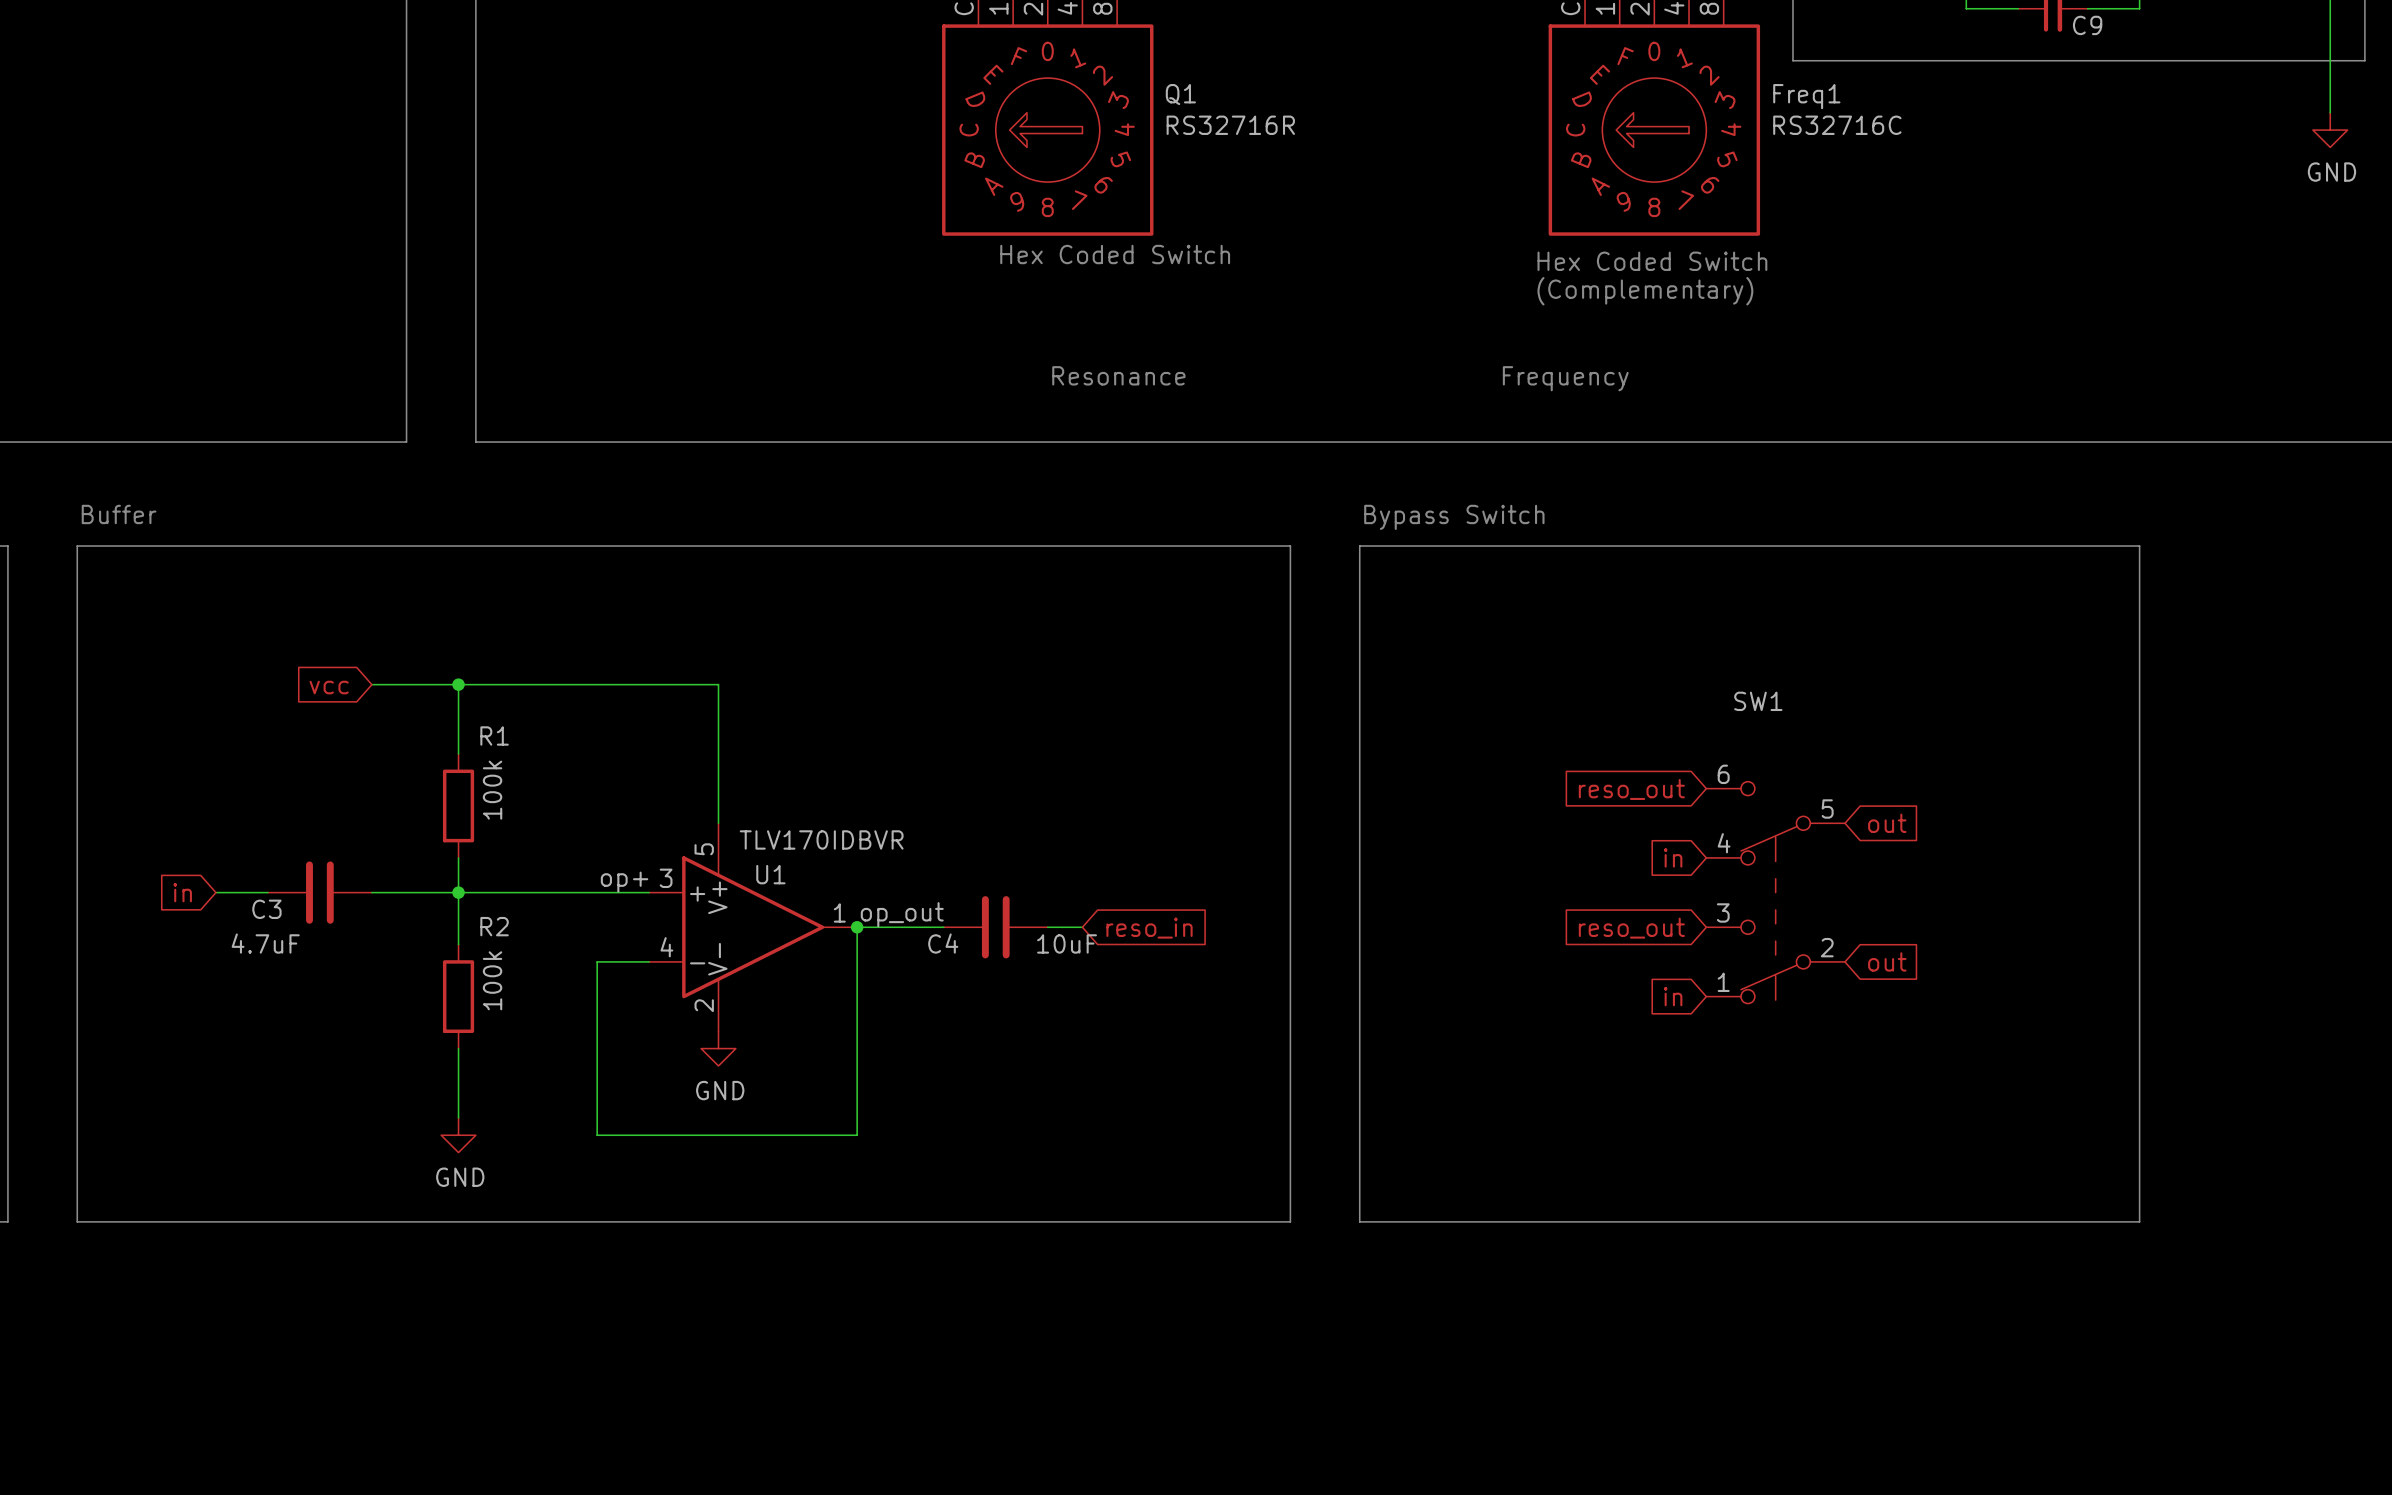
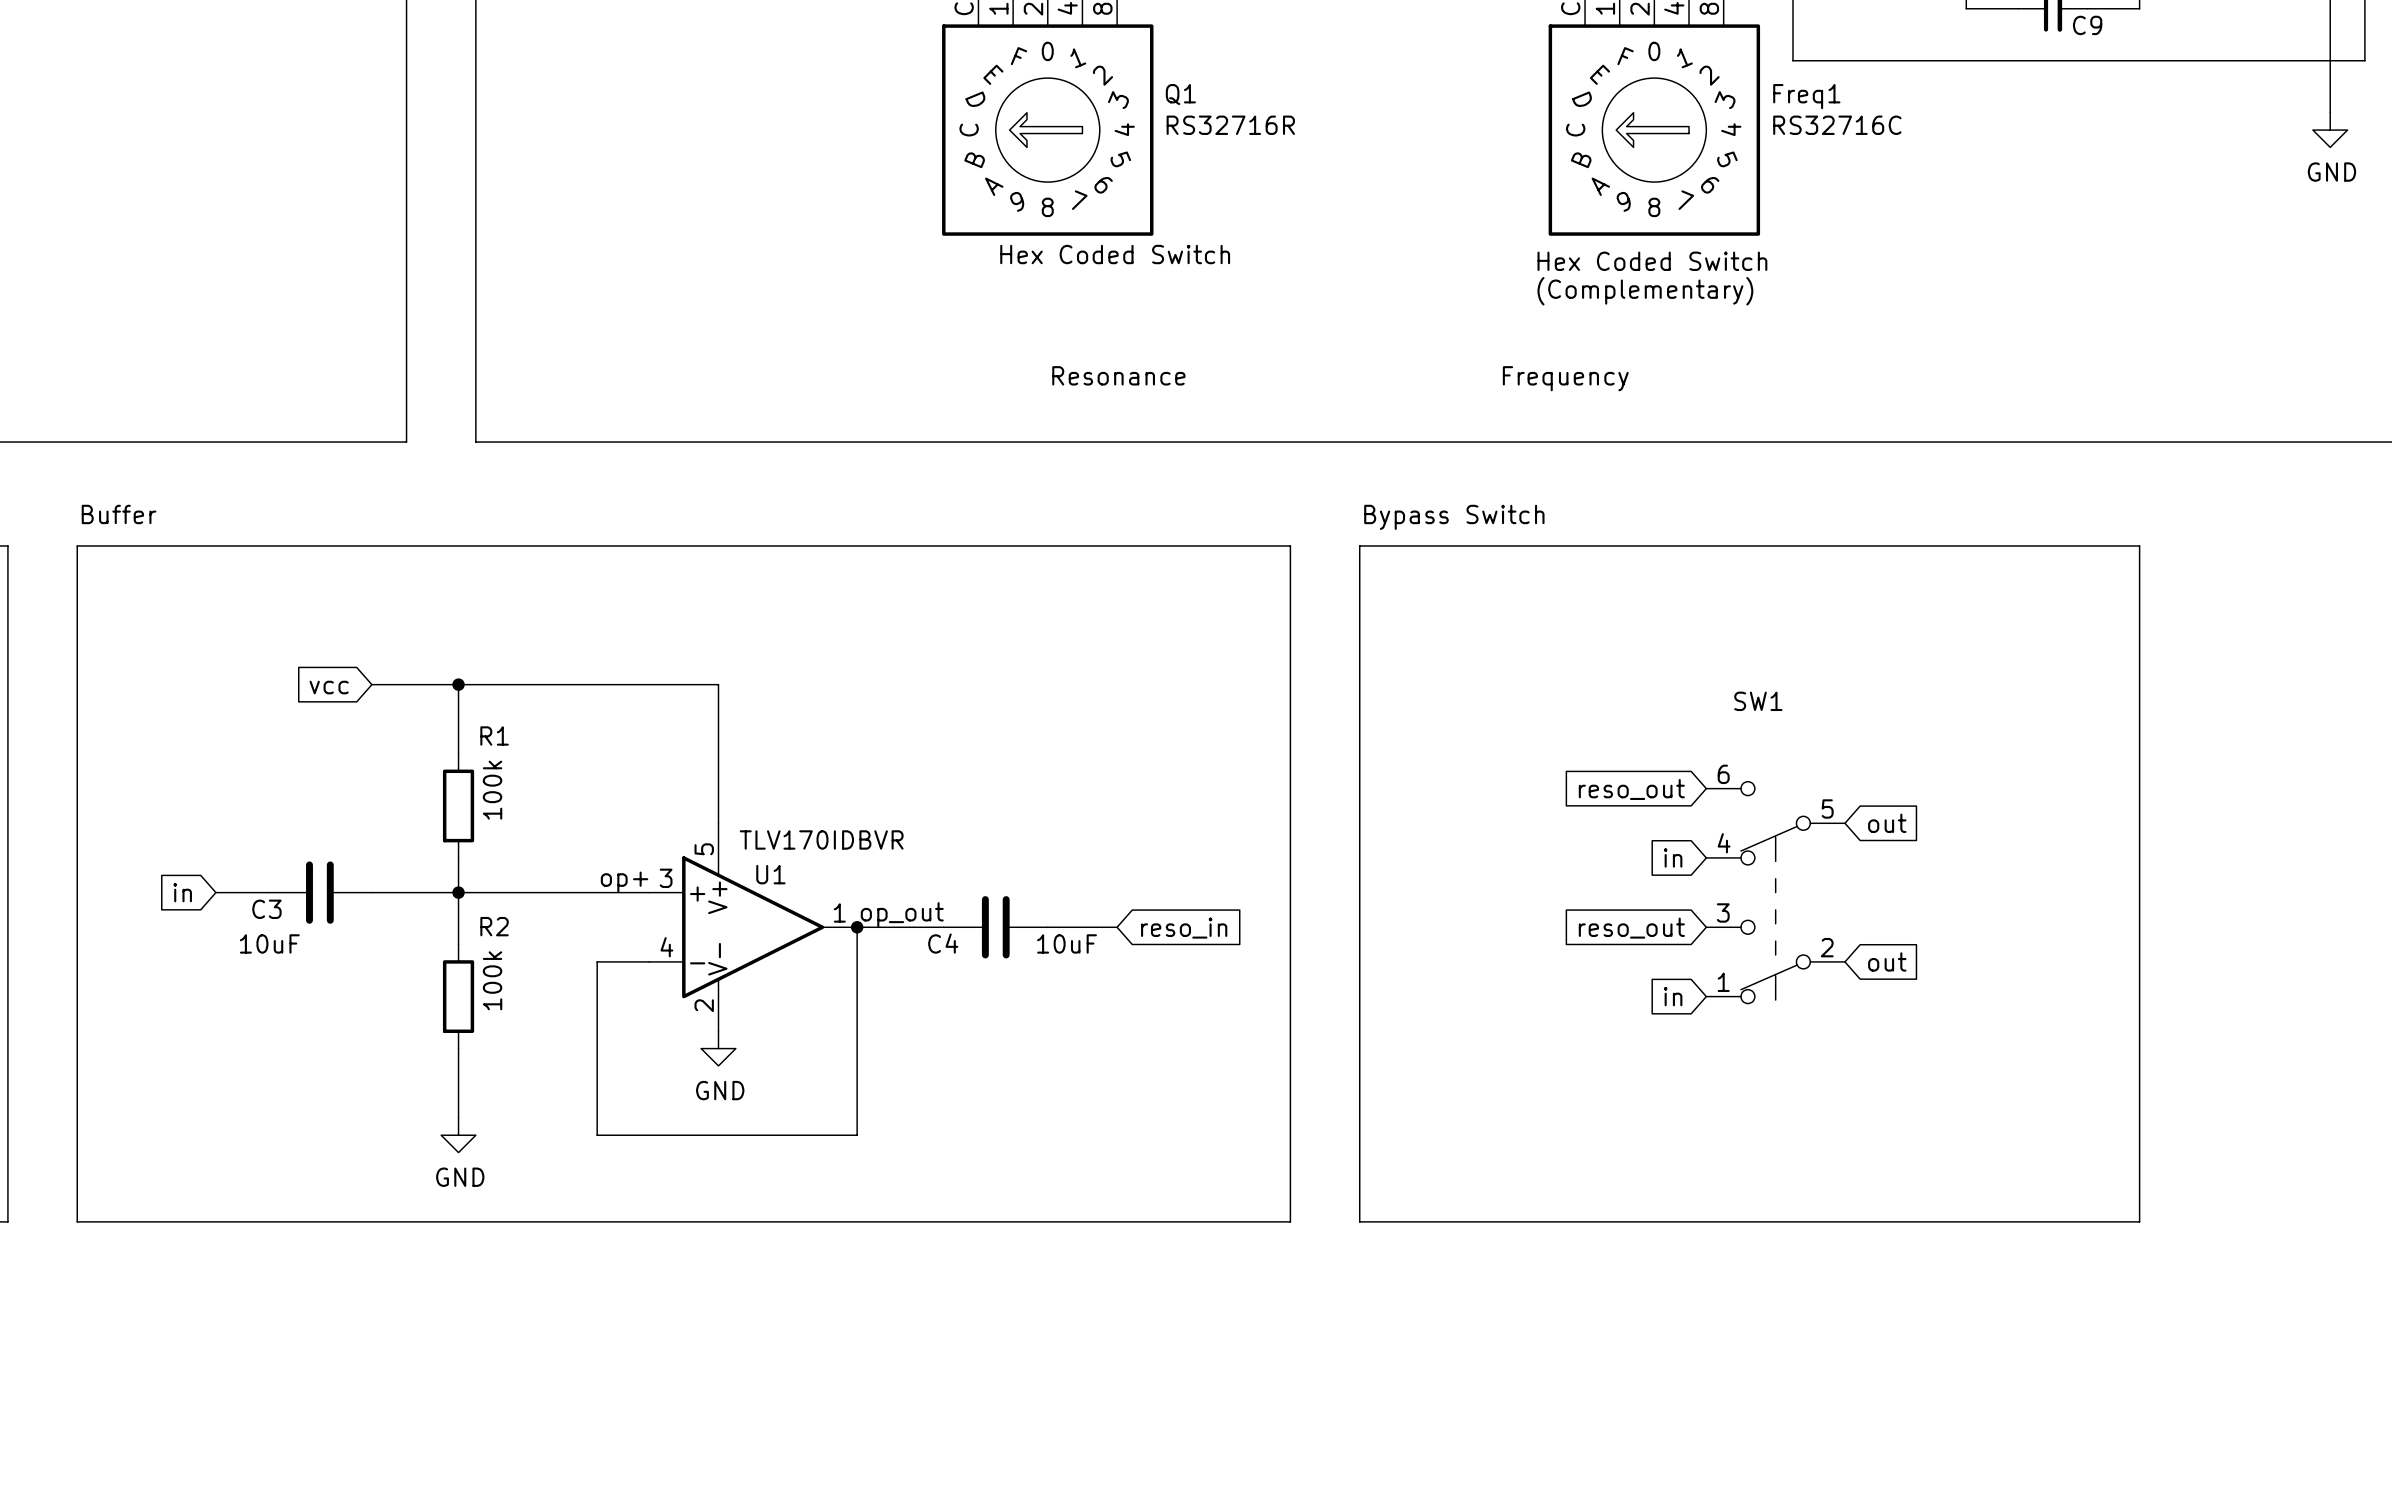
wire: none -> (1082, 927) (1117, 927)
global label position: reso_in (1149, 928) -> reso_in (1184, 928)
C3 value: 4.7uF (265, 943) -> 10uF (269, 943)

